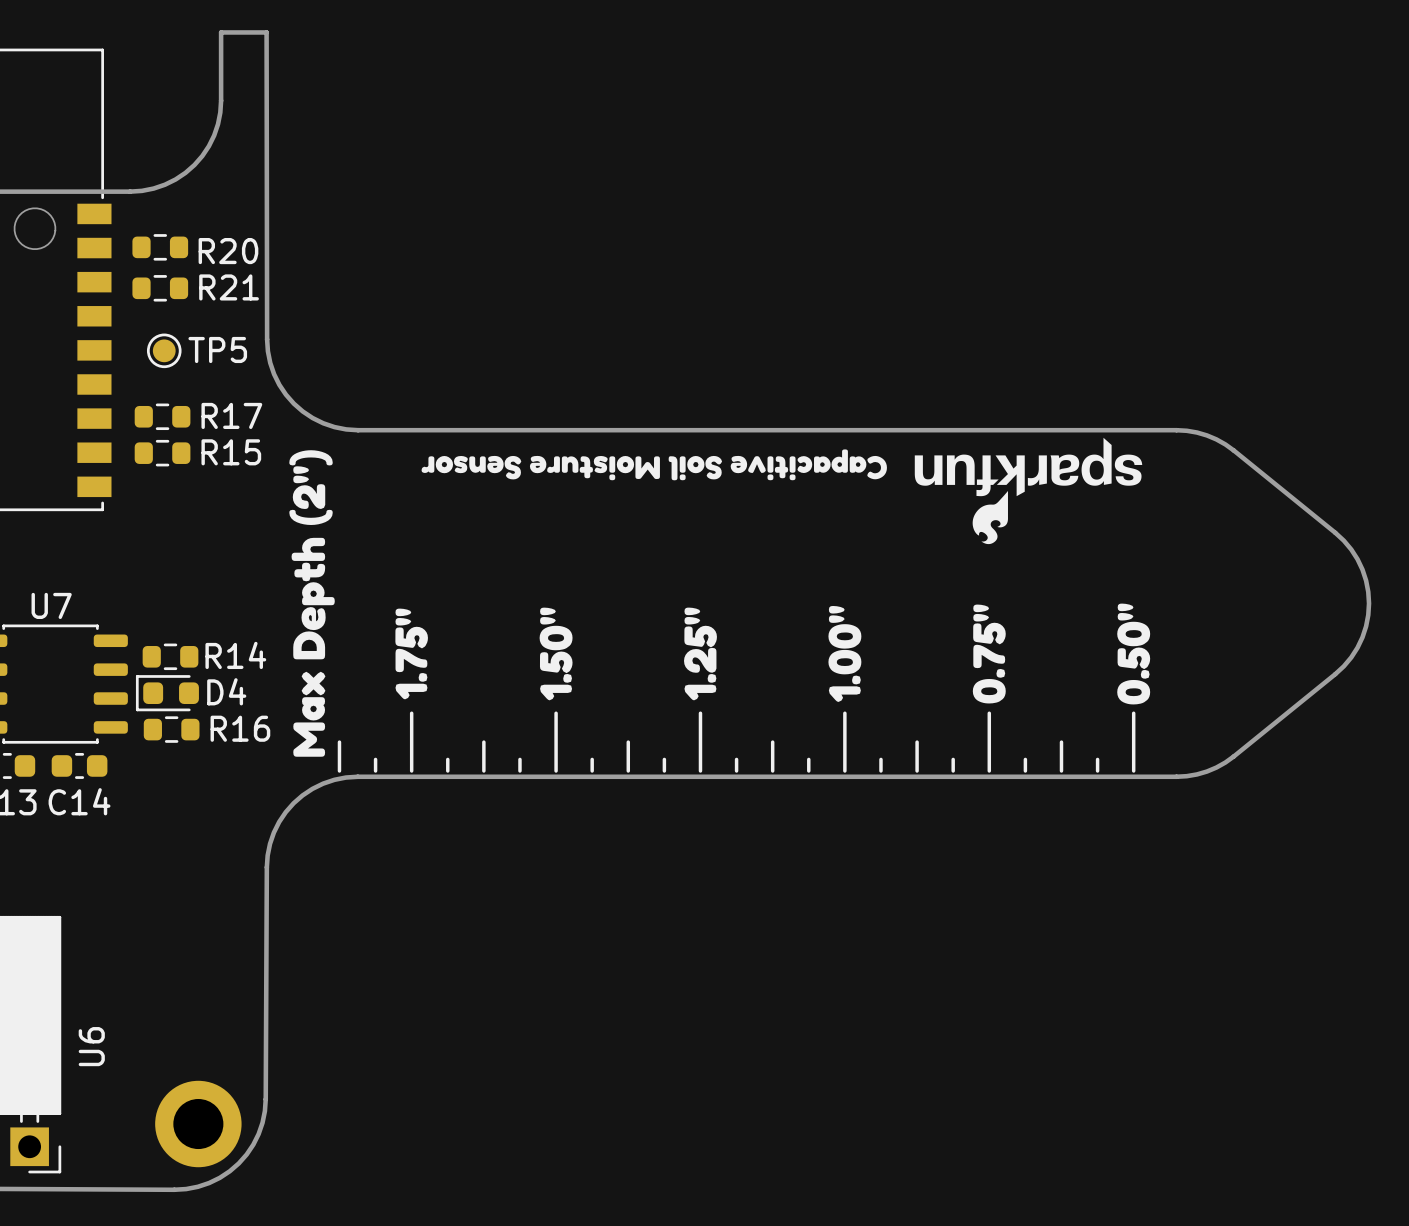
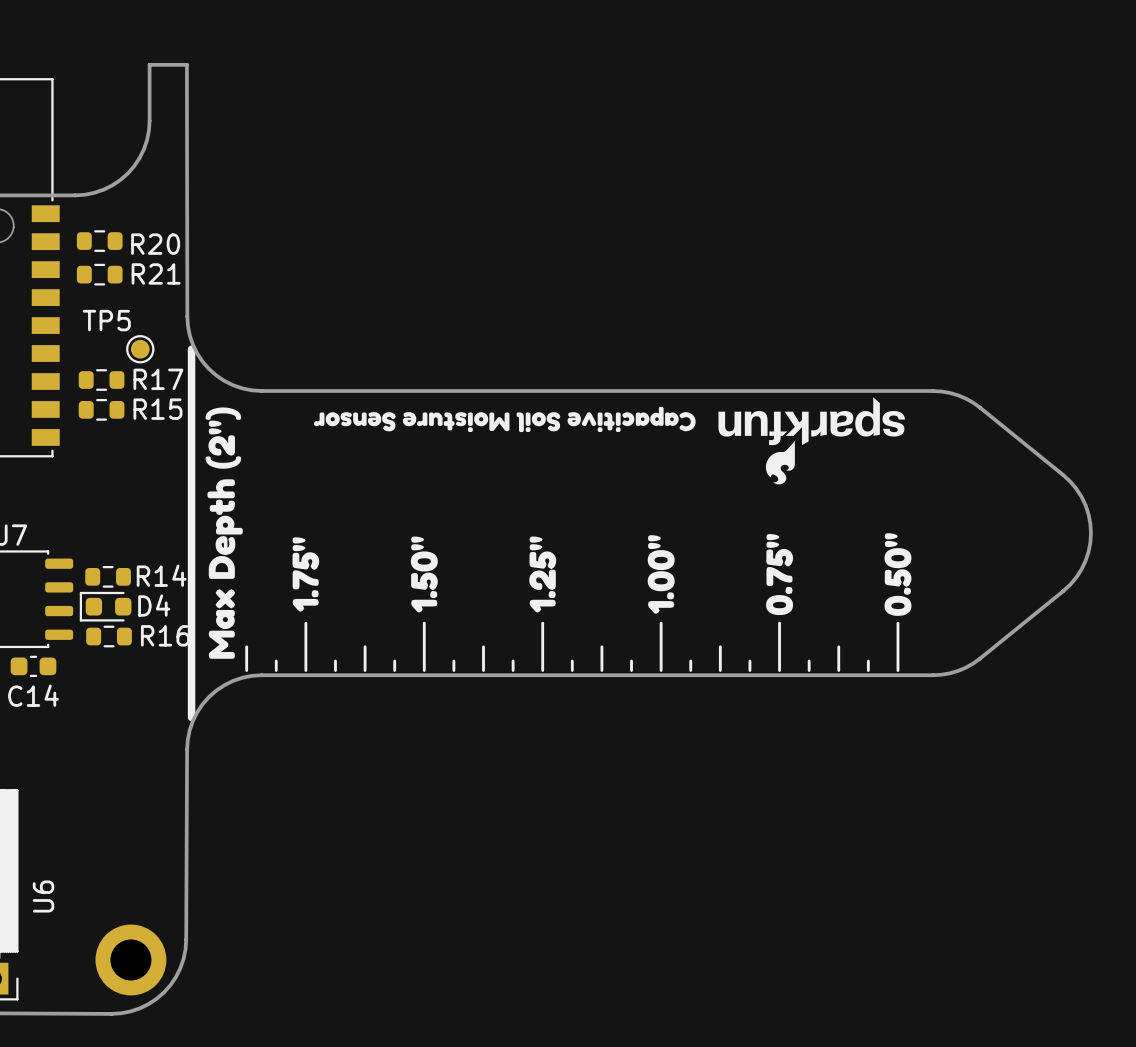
TP5 name position: TP5 (217, 349) -> TP5 (106, 320)
TP5 position: (164, 350) -> (140, 349)
line: none -> (191, 349) (191, 717)

